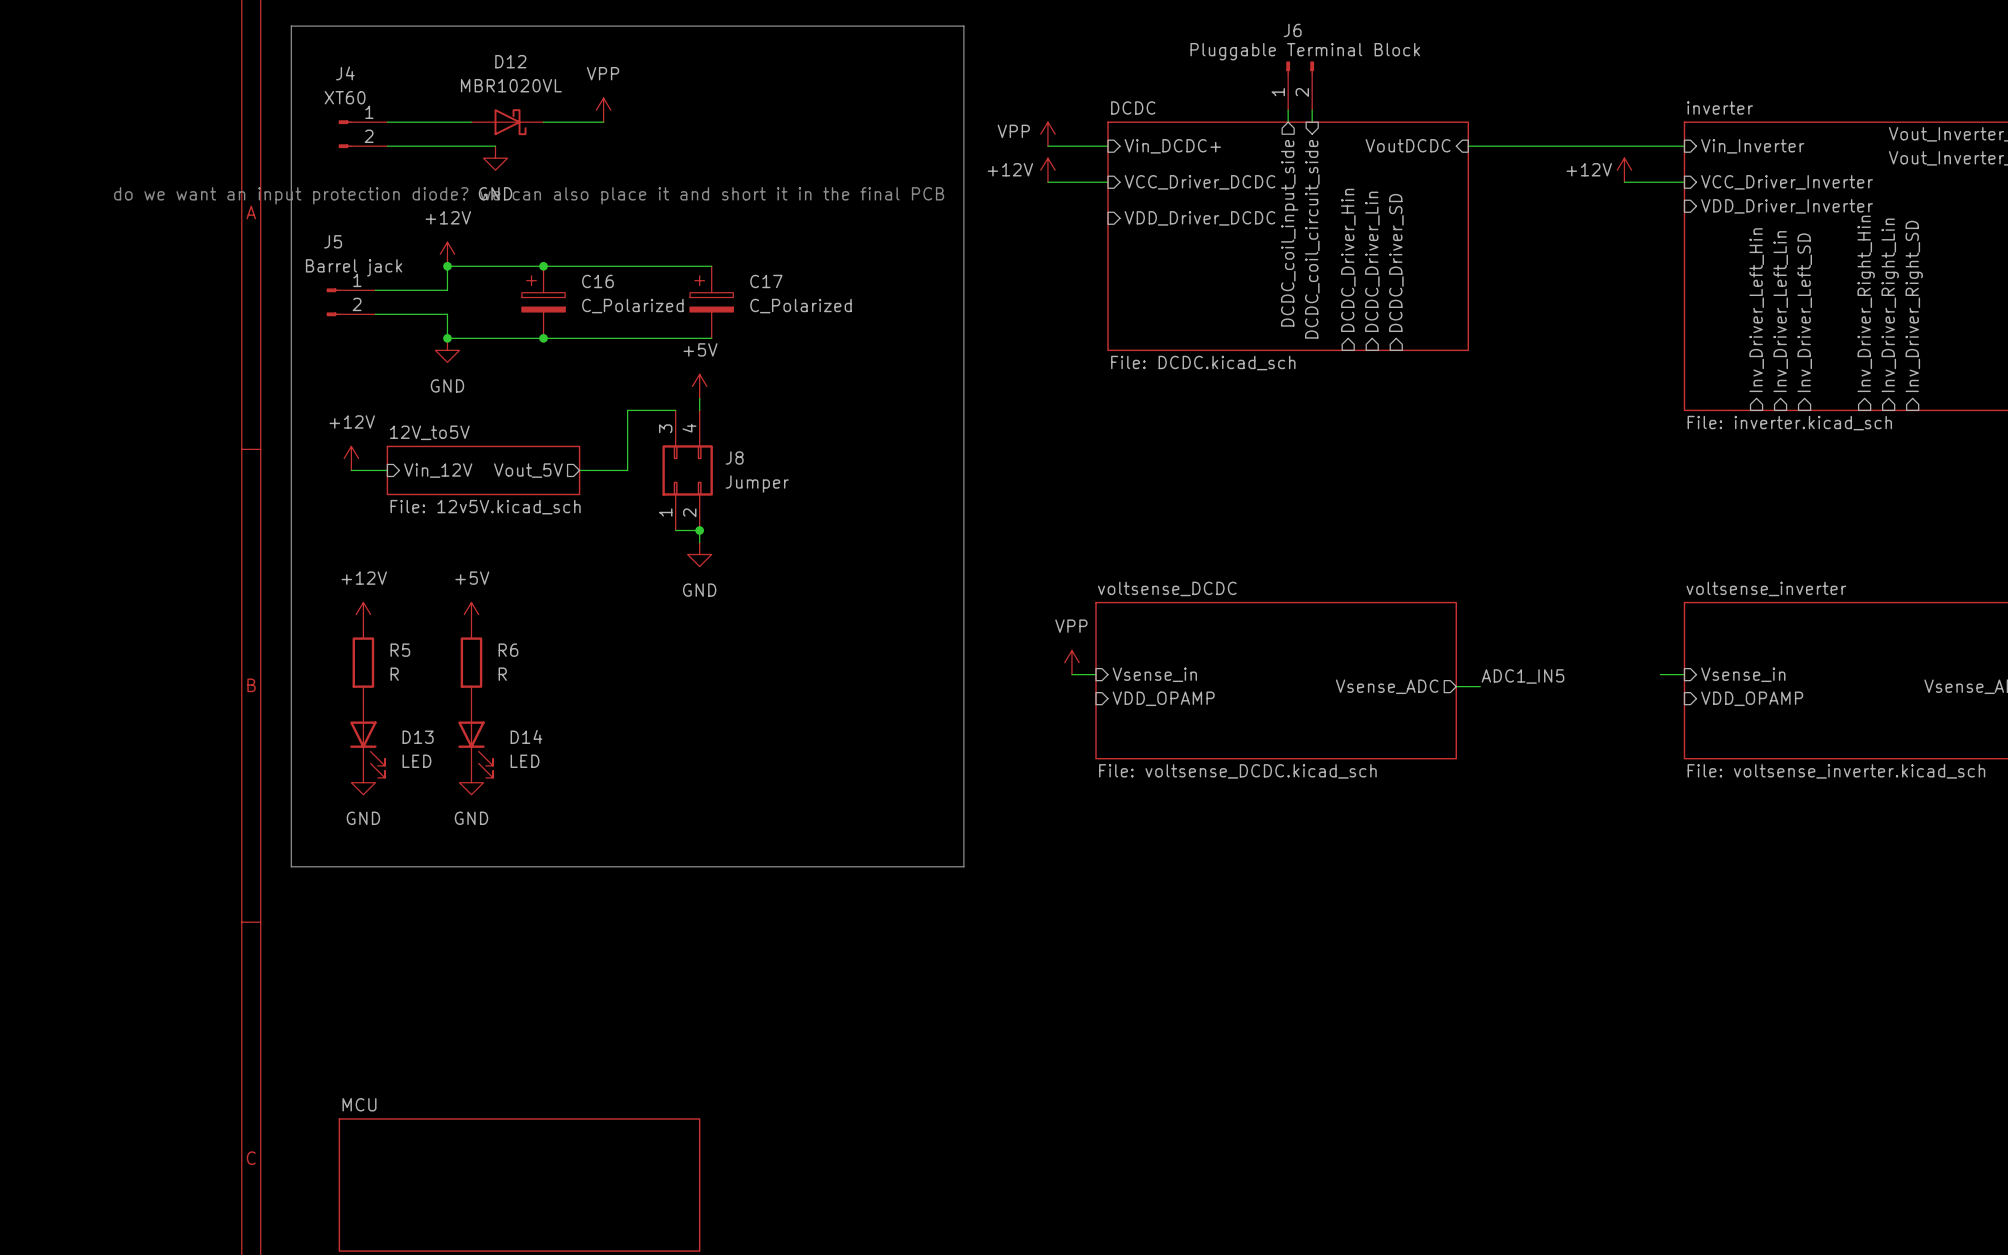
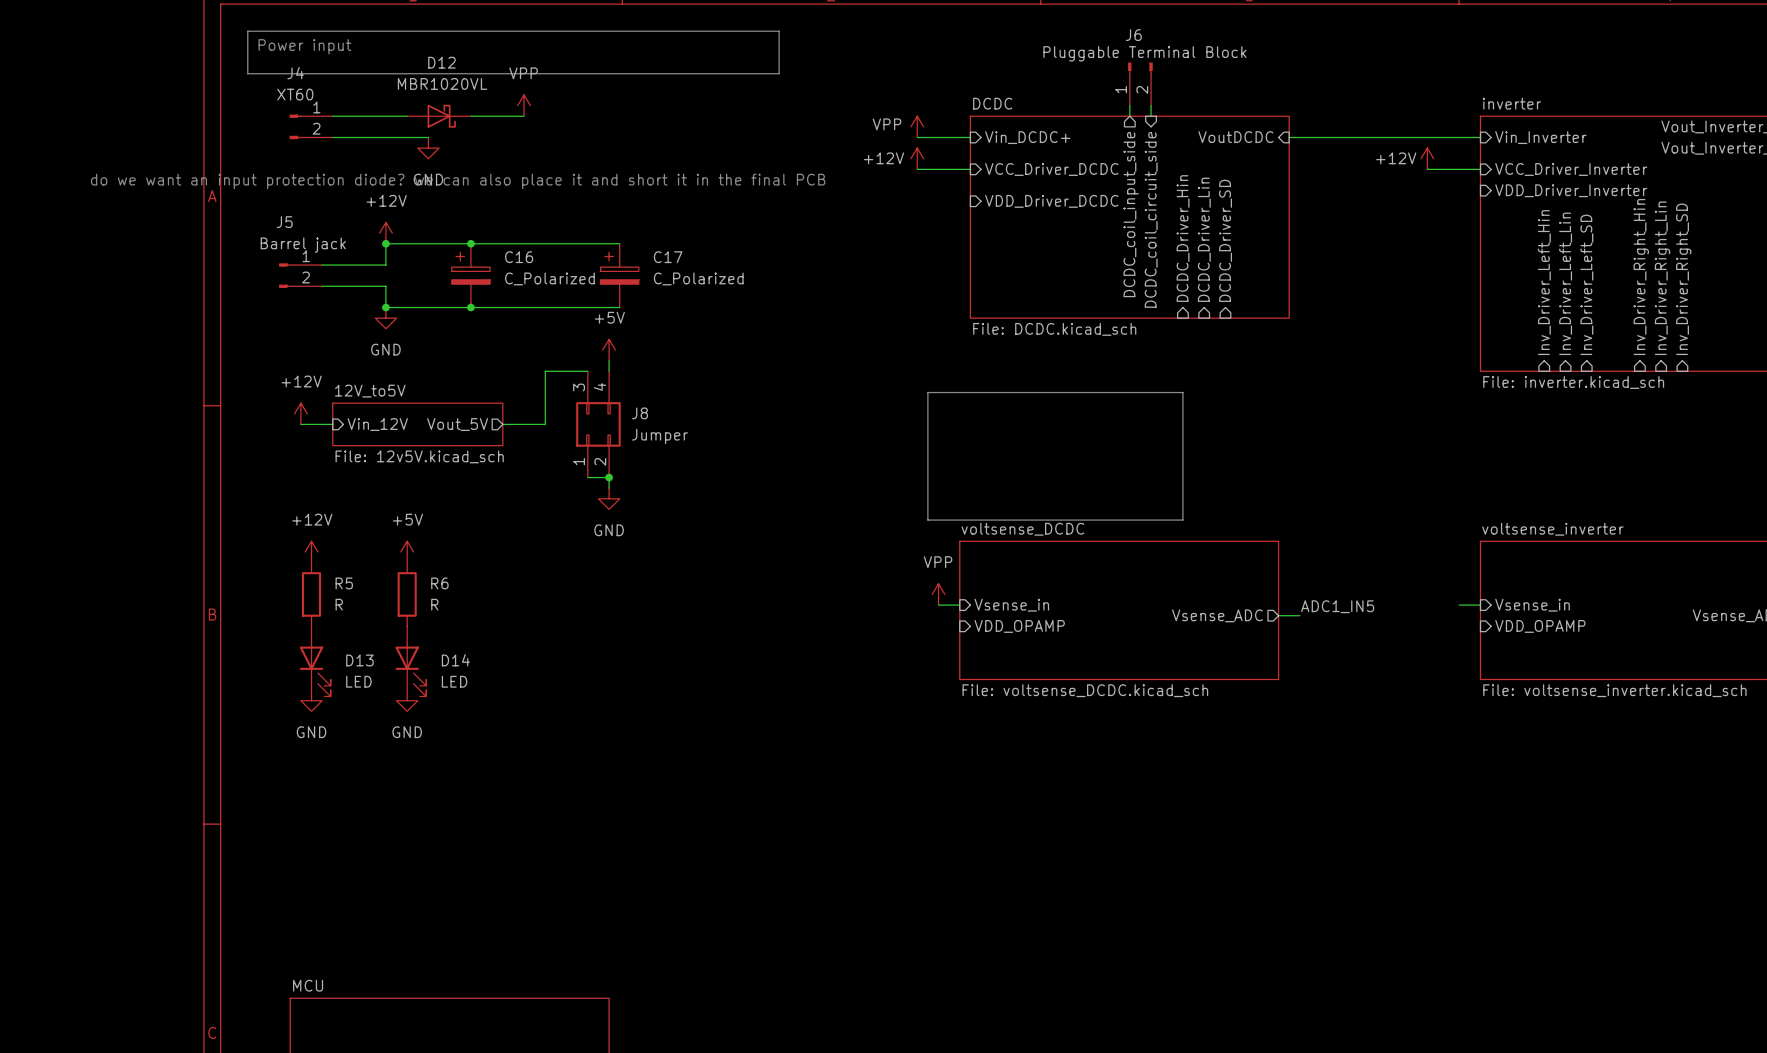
line: (891, 26) (963, 26) (963, 866) (291, 866) (291, 74) -> (779, 31) (779, 73) (247, 73)
text: none -> Power input (304, 46)
line: none -> (927, 392) (1182, 392) (1182, 520) (927, 520) (927, 392)

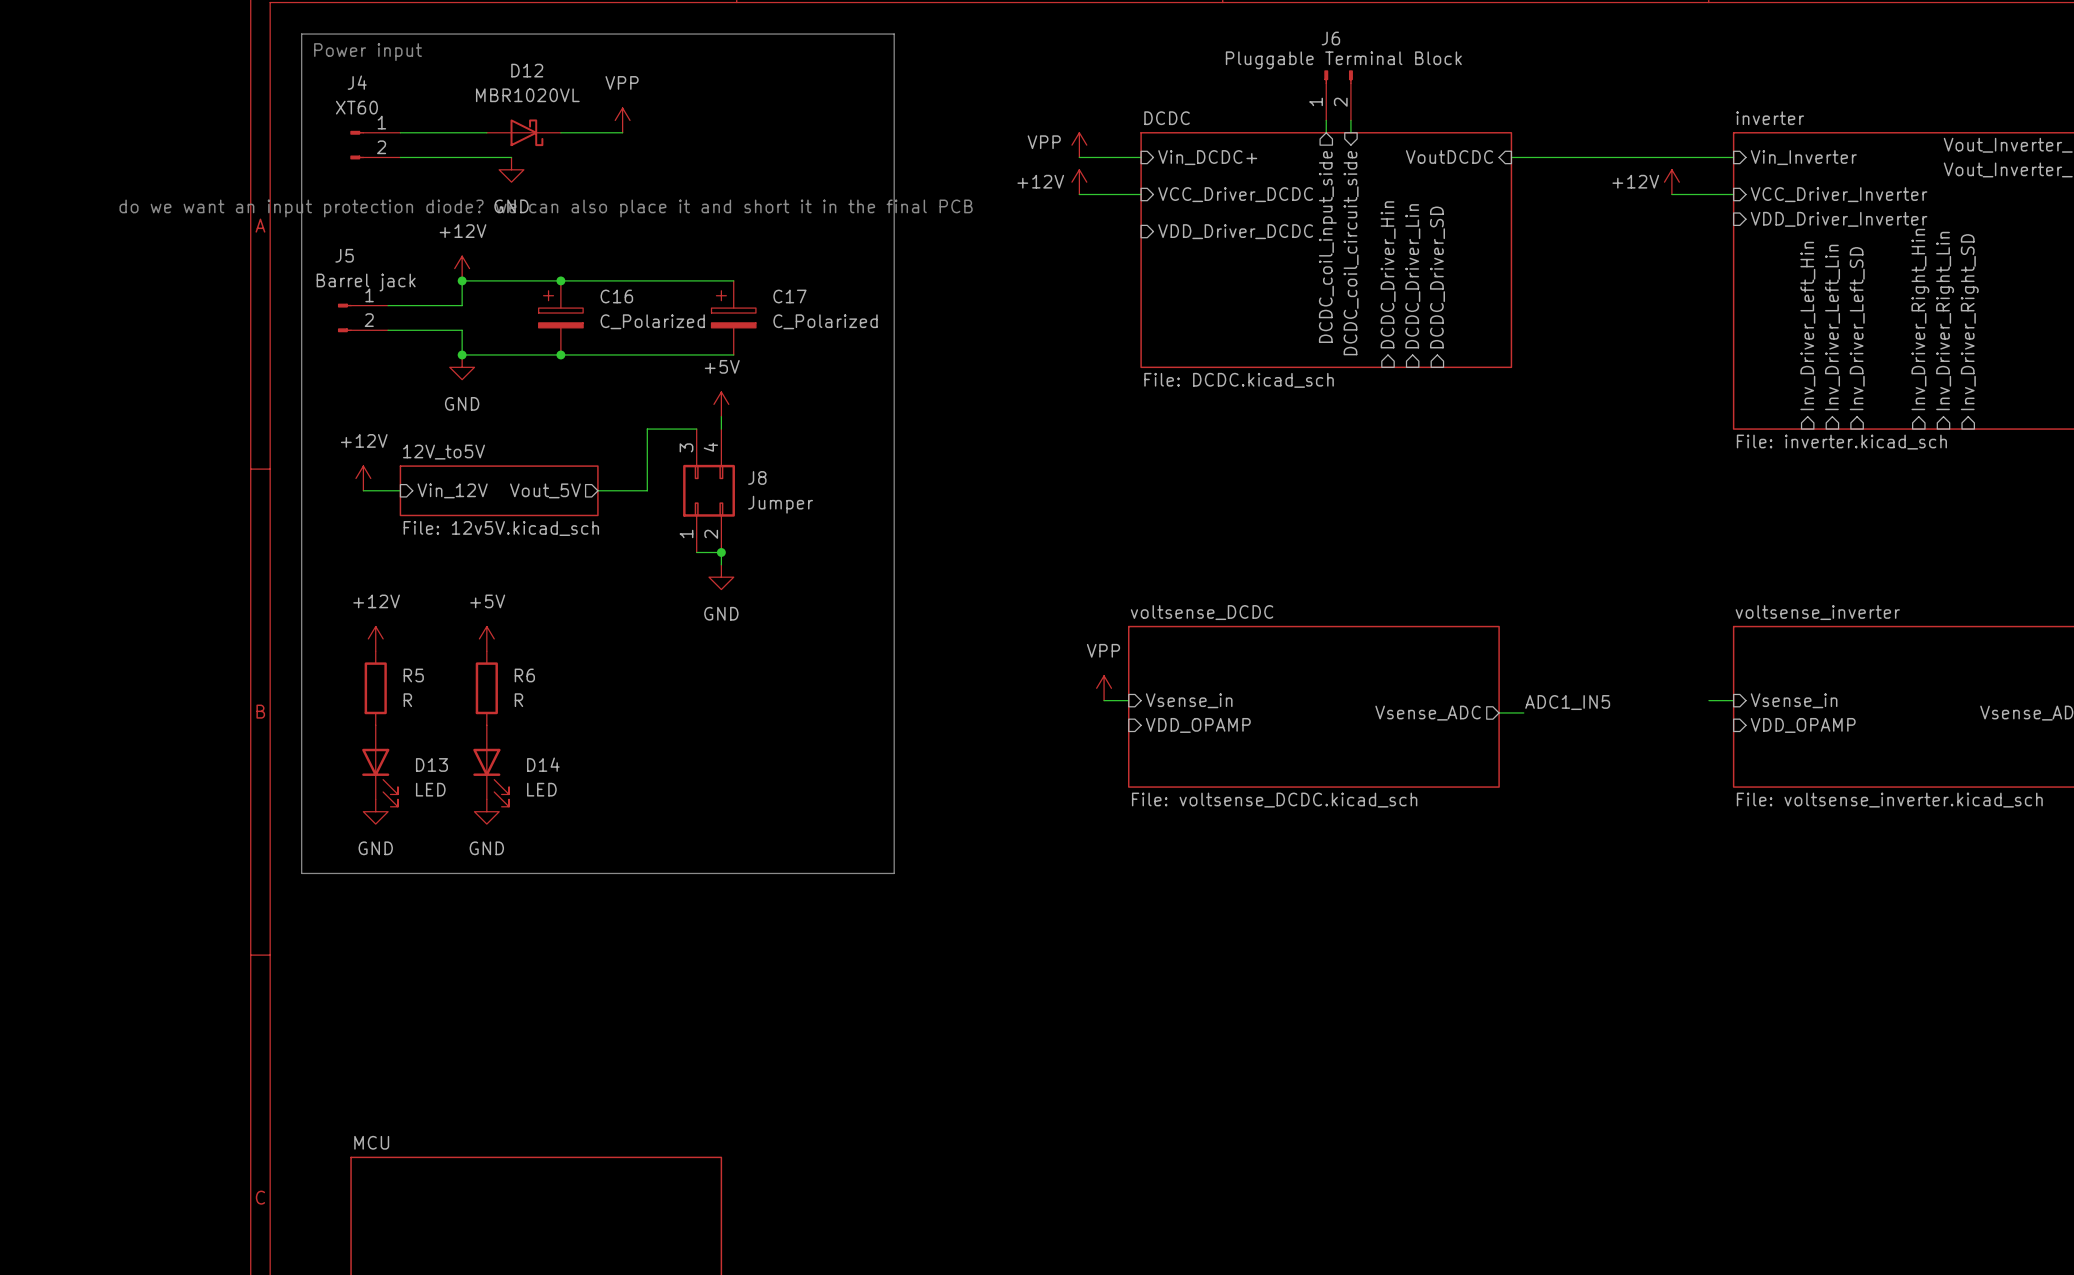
line: (757, 31) (779, 31) (779, 73) (247, 73) -> (894, 34) (894, 873) (301, 873) (301, 83)
line: (927, 392) (1182, 392) (1182, 520) (927, 520) (927, 392) -> none

